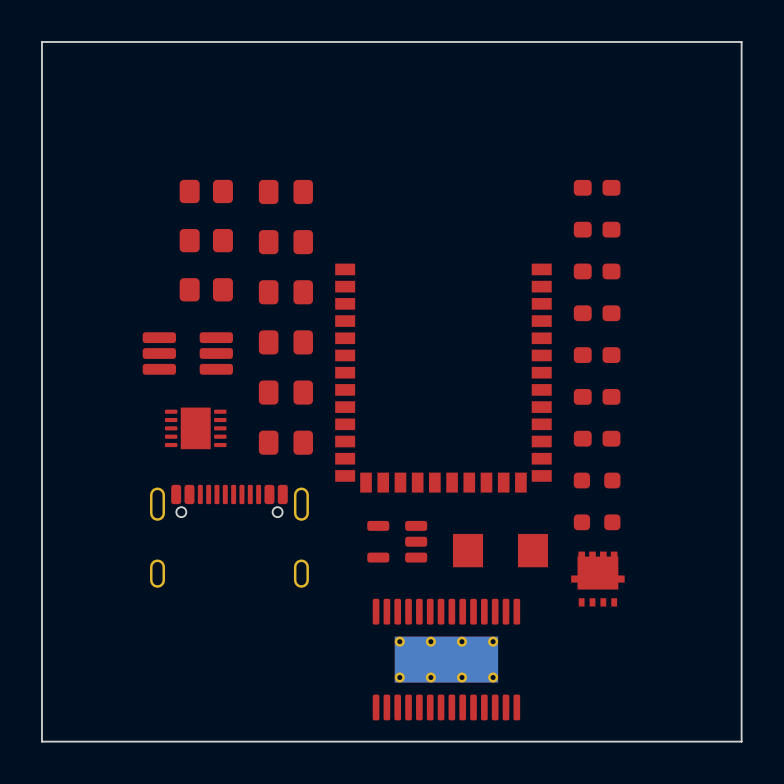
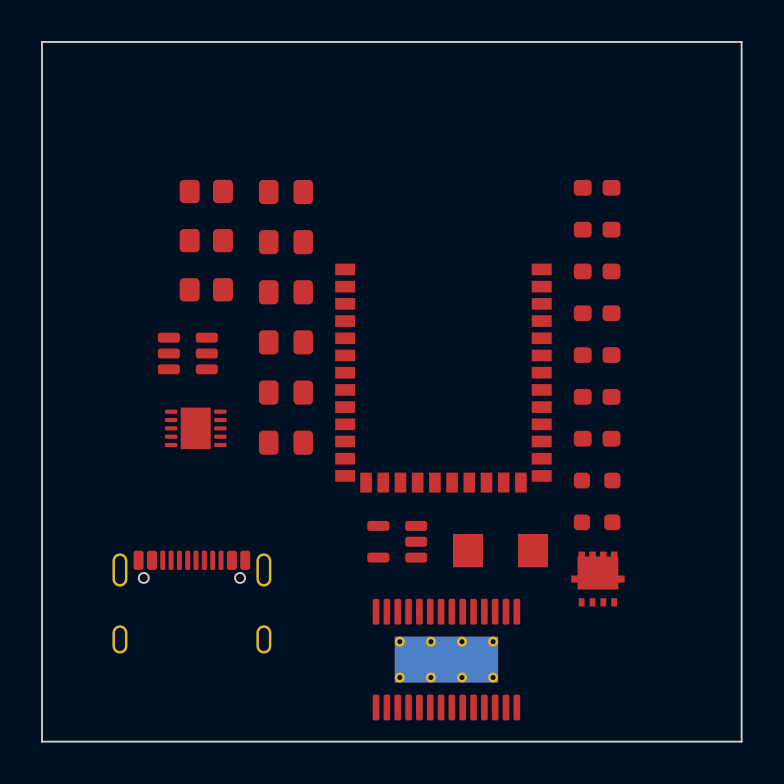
part footprint: [142, 332, 233, 375] -> [157, 332, 218, 375]
part position: (229, 536) -> (191, 602)

